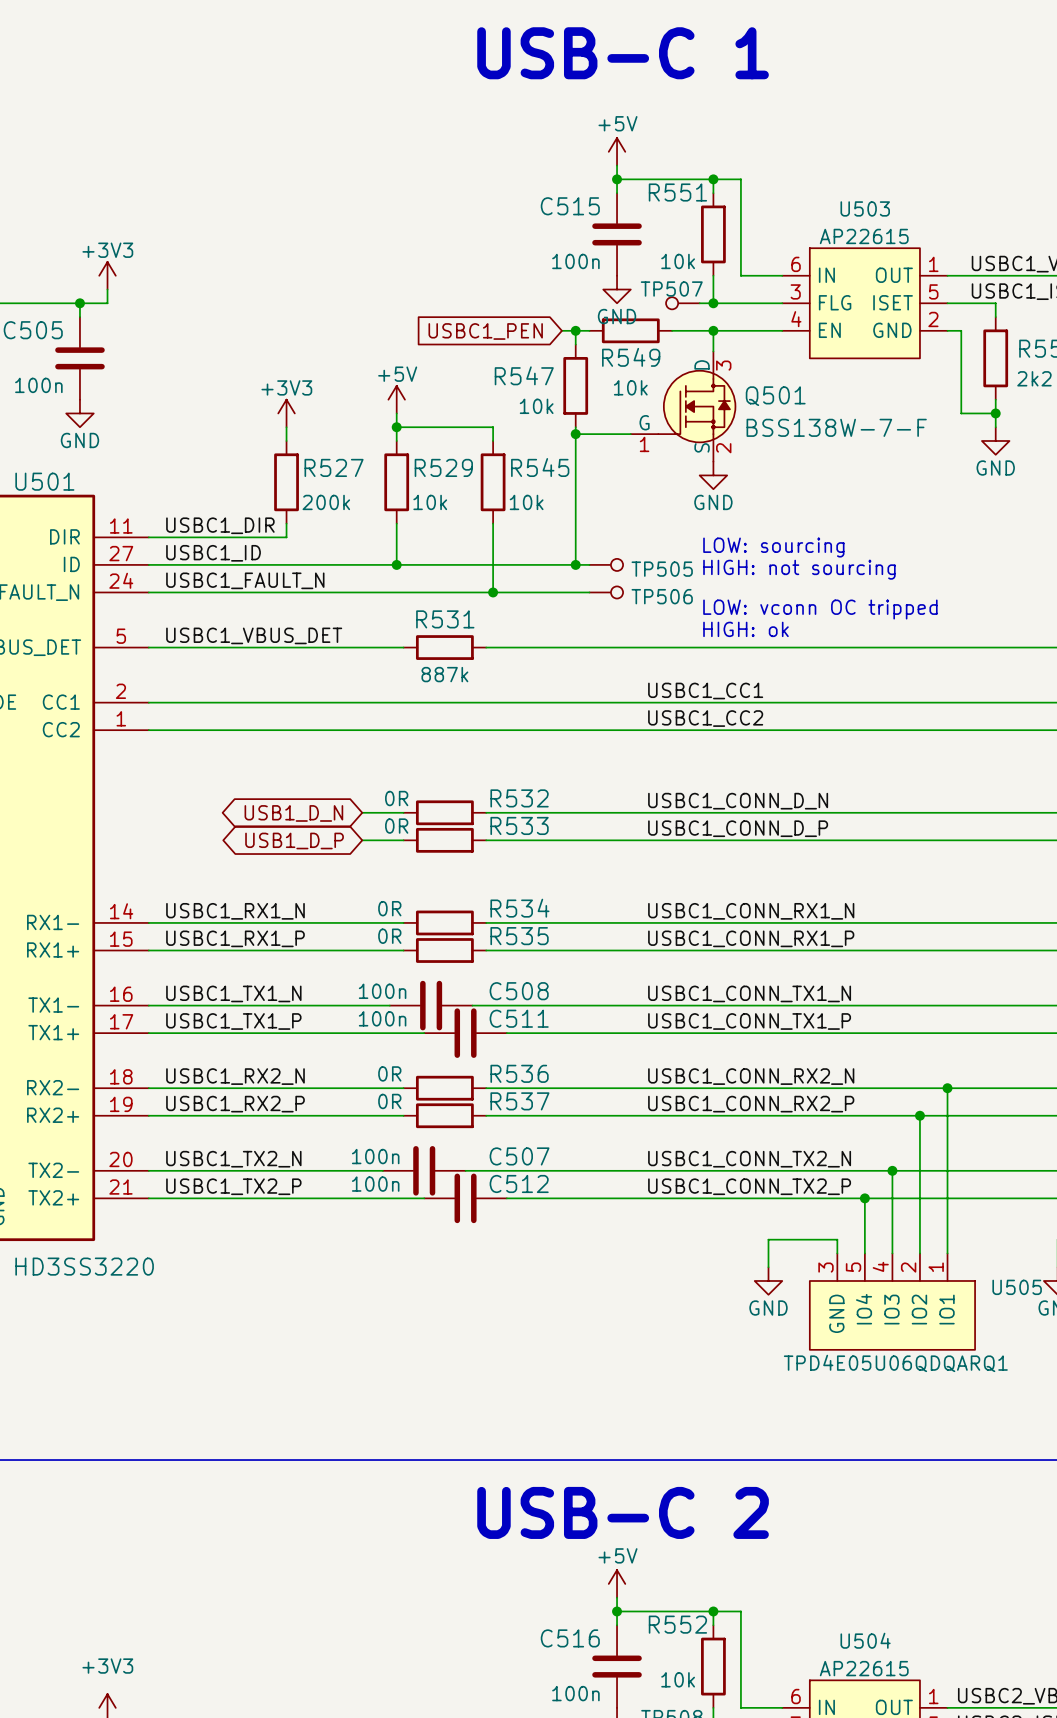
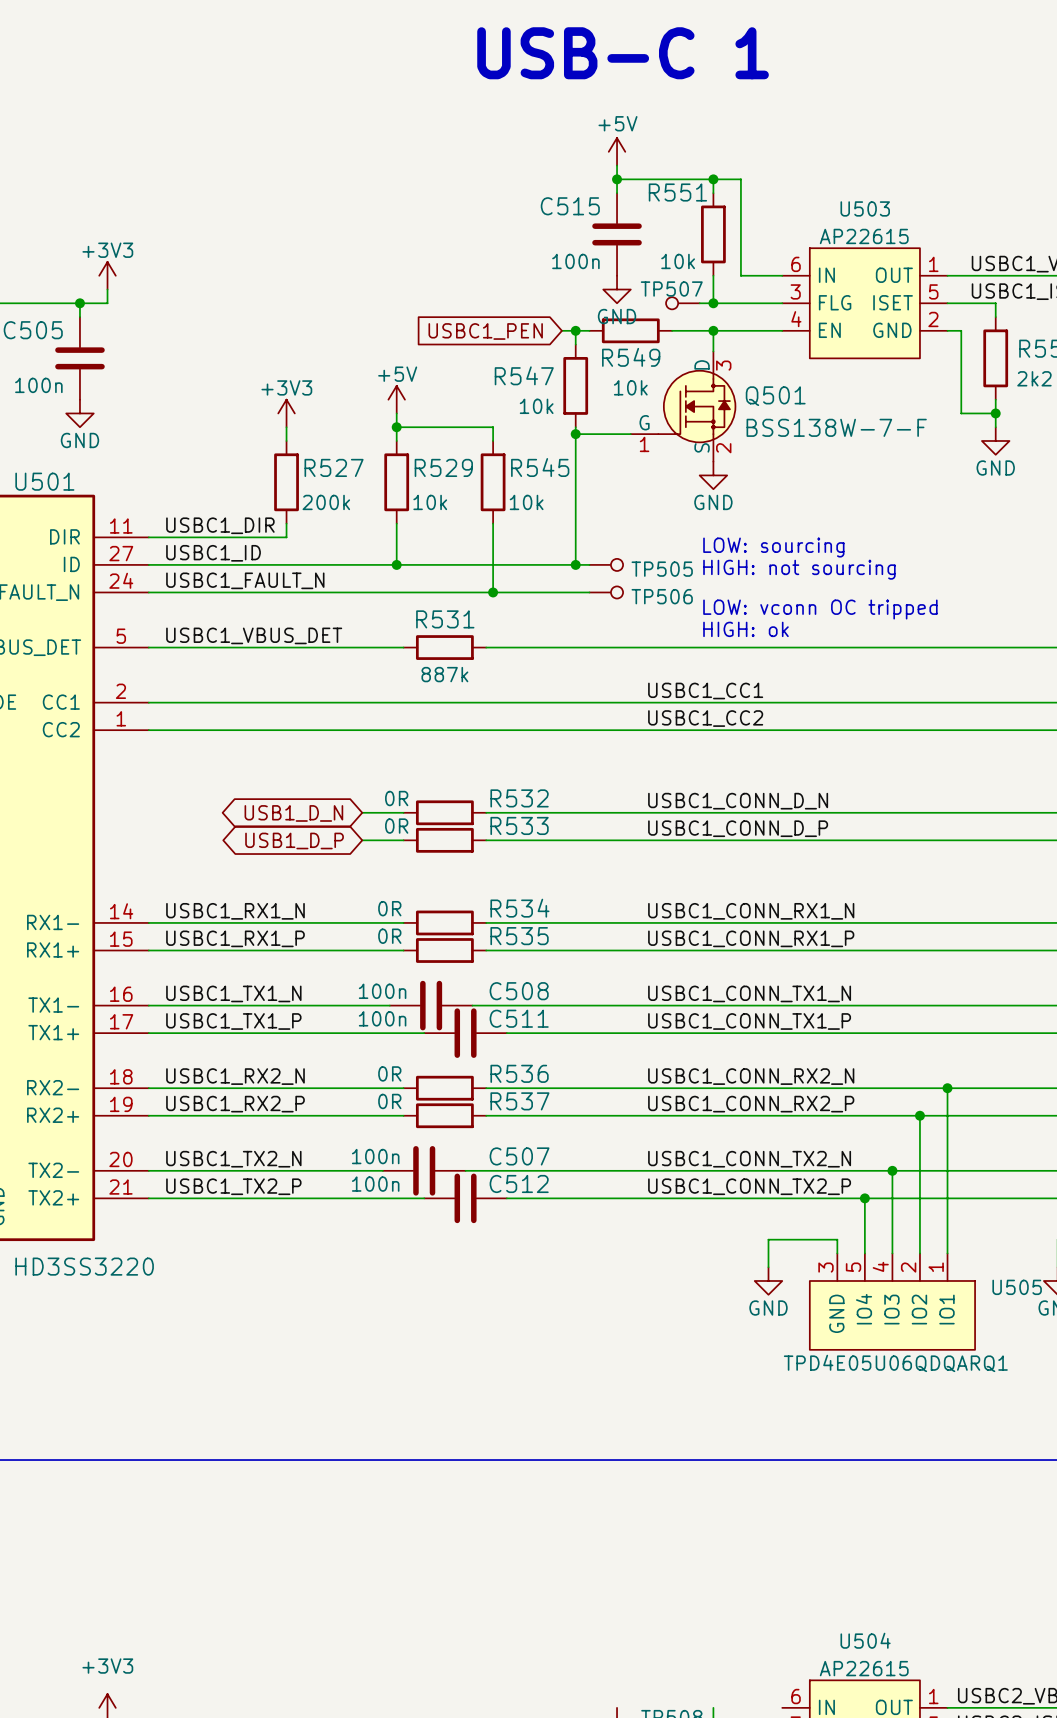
text: USB-C 2 (623, 1512) -> none
power symbol: +5V (617, 1583) -> none
wire: (617, 1597) (617, 1625) -> none
wire: (617, 1611) (740, 1611) (740, 1707) (782, 1707) -> none
junction: (617, 1611) -> none
wire: (713, 1611) (713, 1625) -> none
junction: (713, 1611) -> none
C516: (617, 1666) -> none
R552: (713, 1666) -> none

